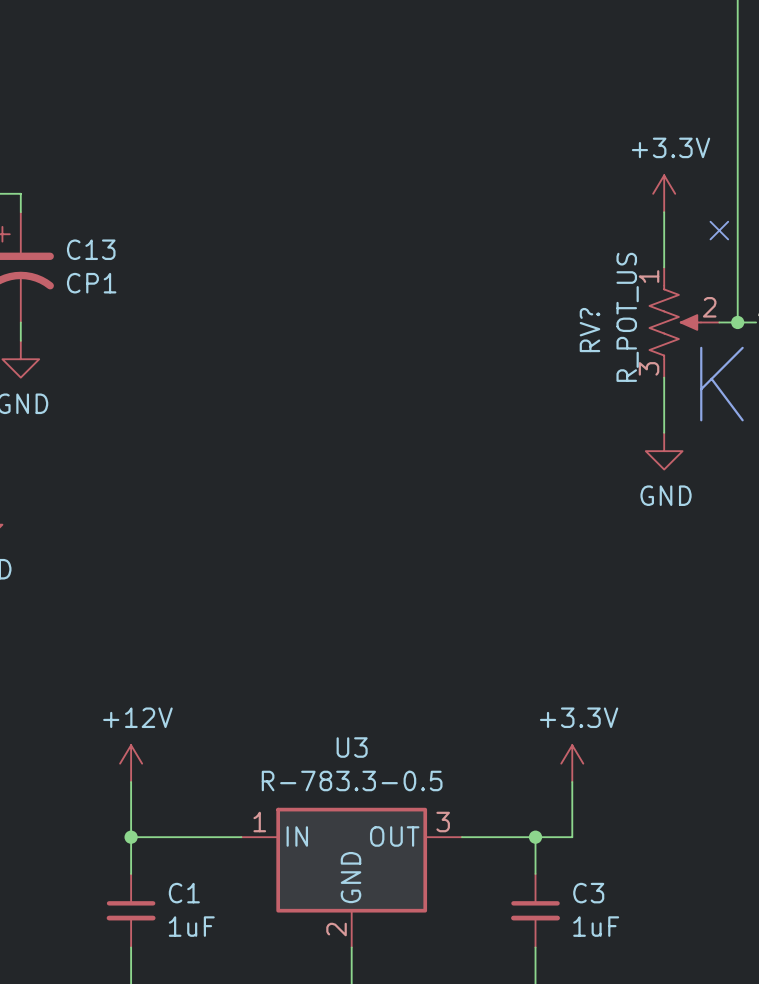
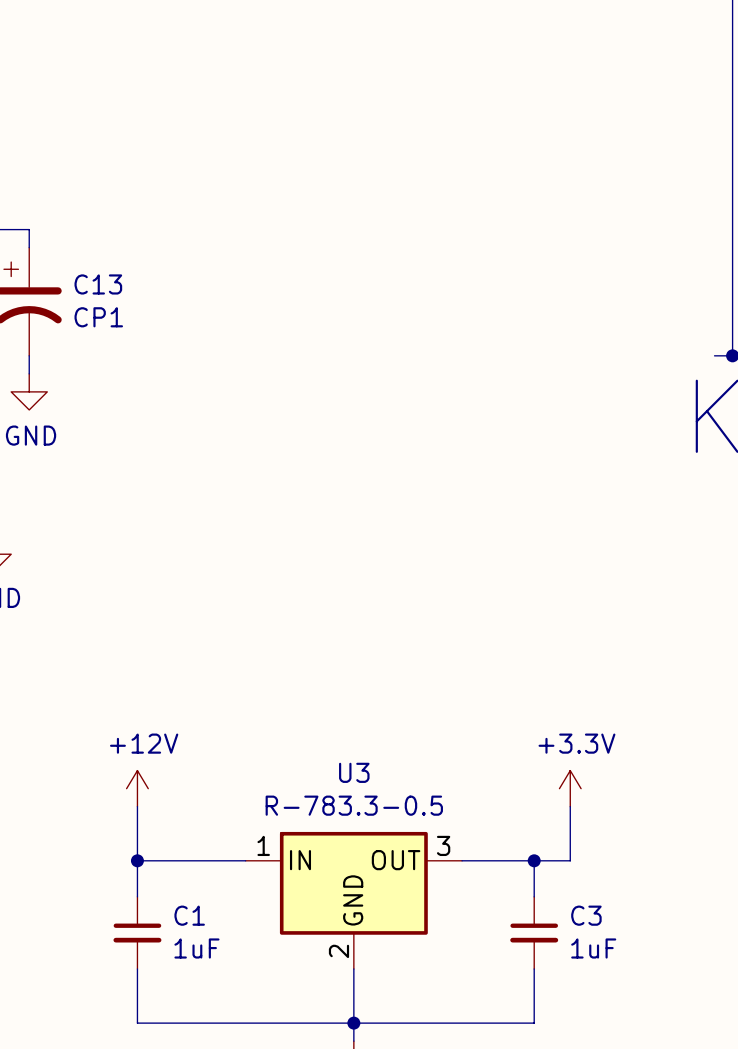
power symbol: +3.3V (664, 193) -> none
wire: (664, 212) (664, 267) -> none
no-connect mark: (719, 230) -> none
RV?: R_POT_US (684, 322) -> none
wire: (664, 377) (664, 432) -> none
power symbol: GND (664, 451) -> none

